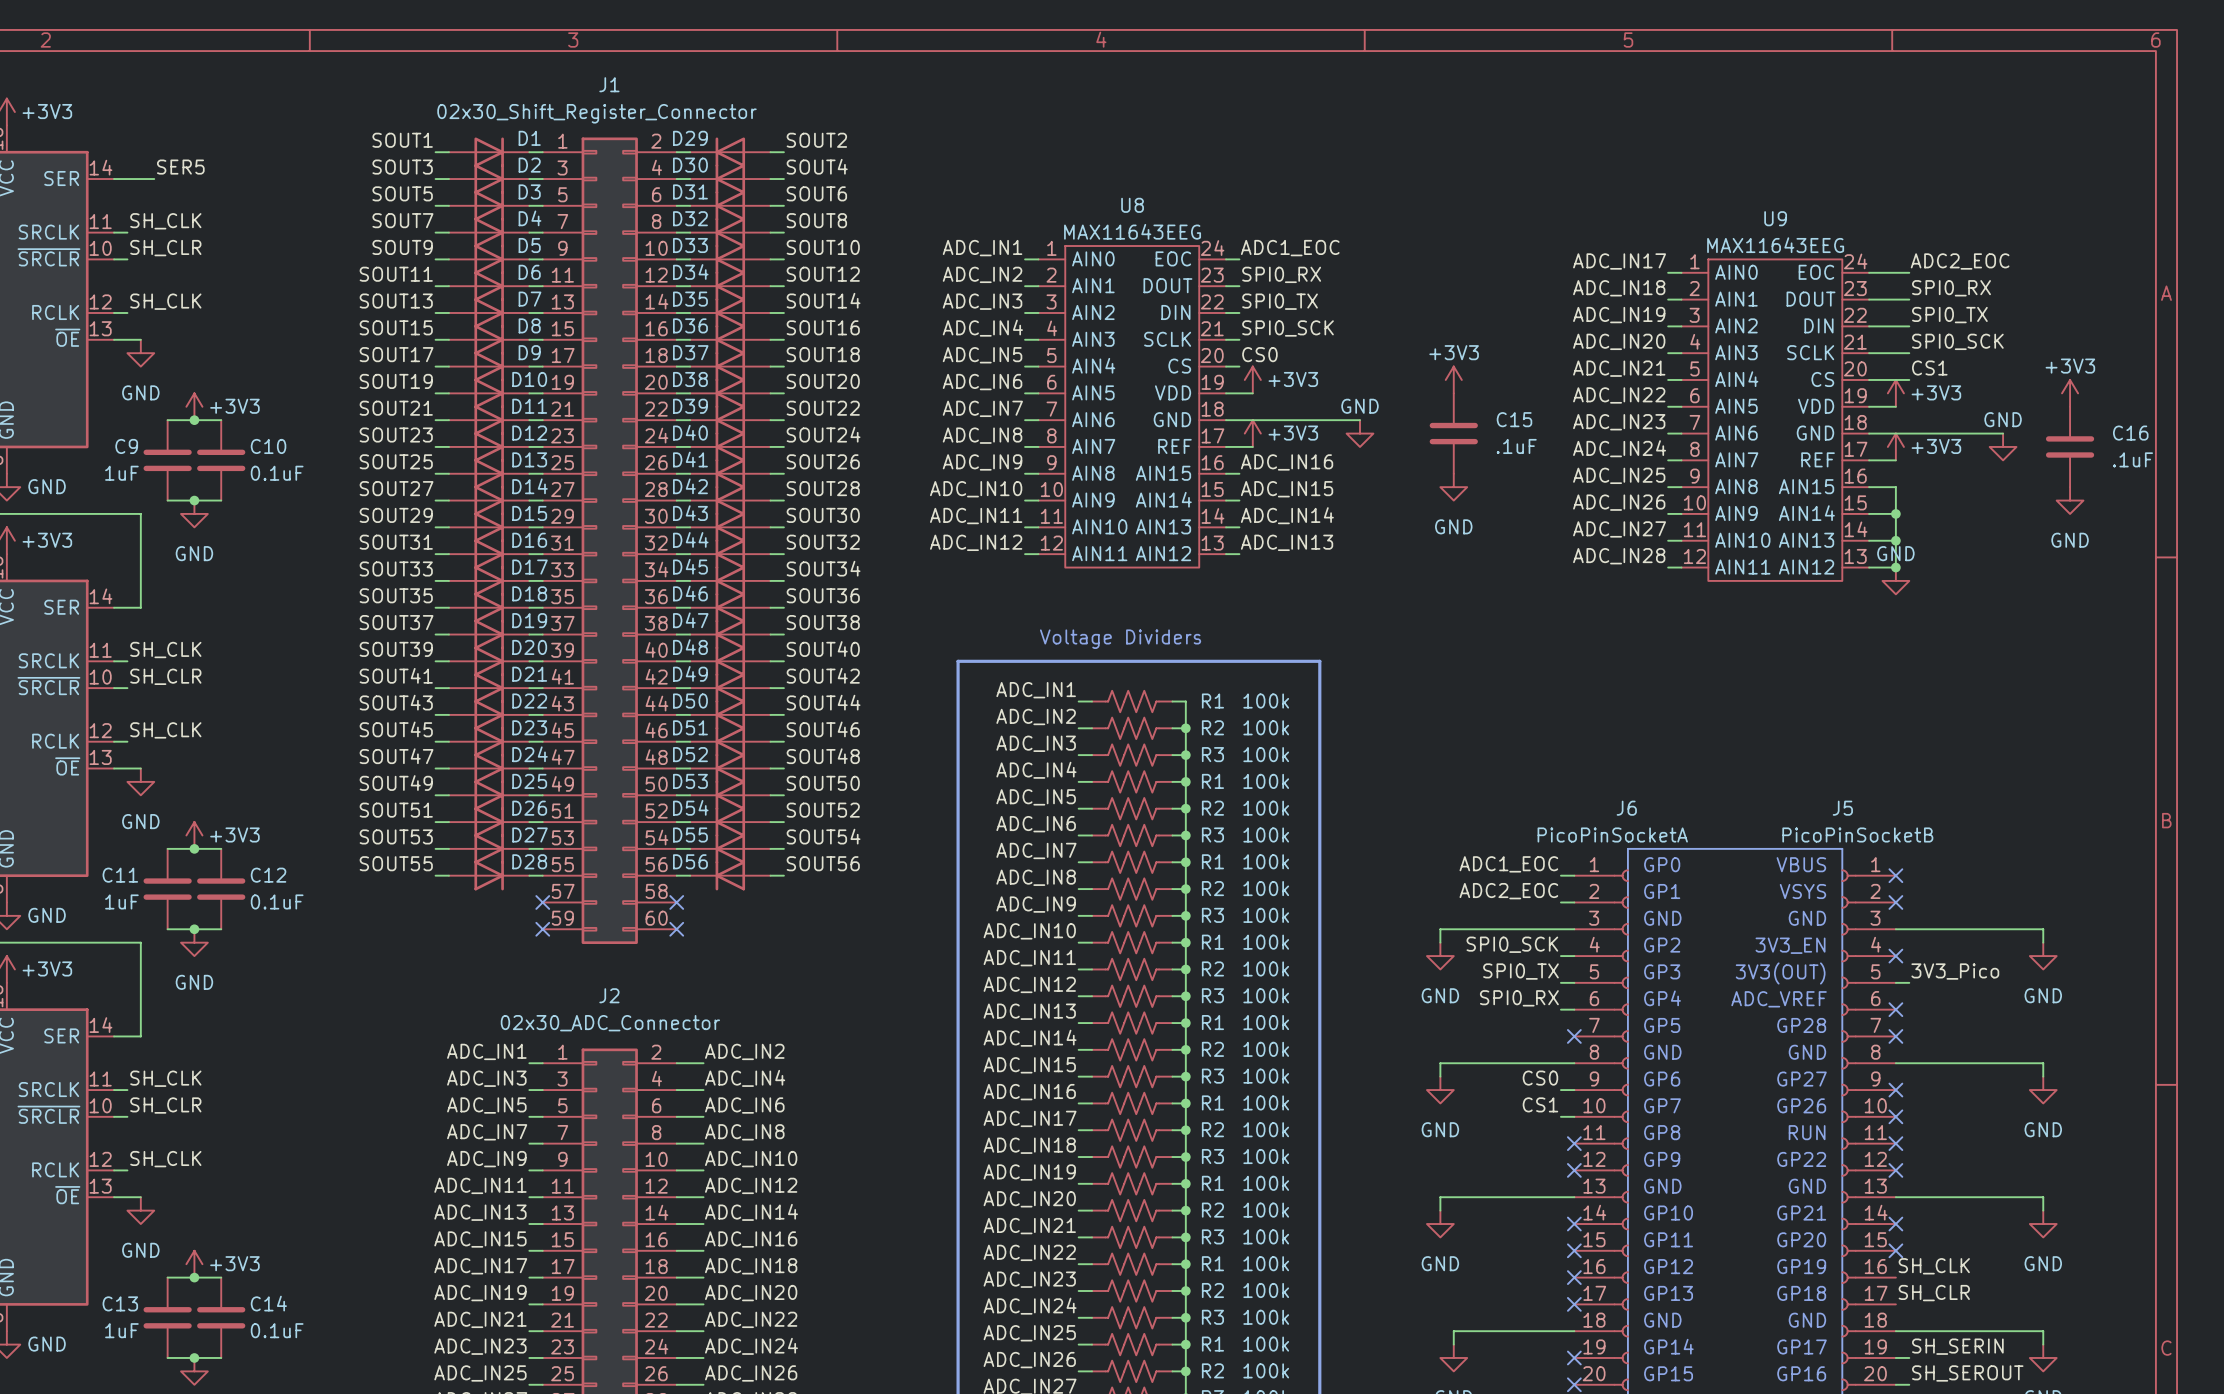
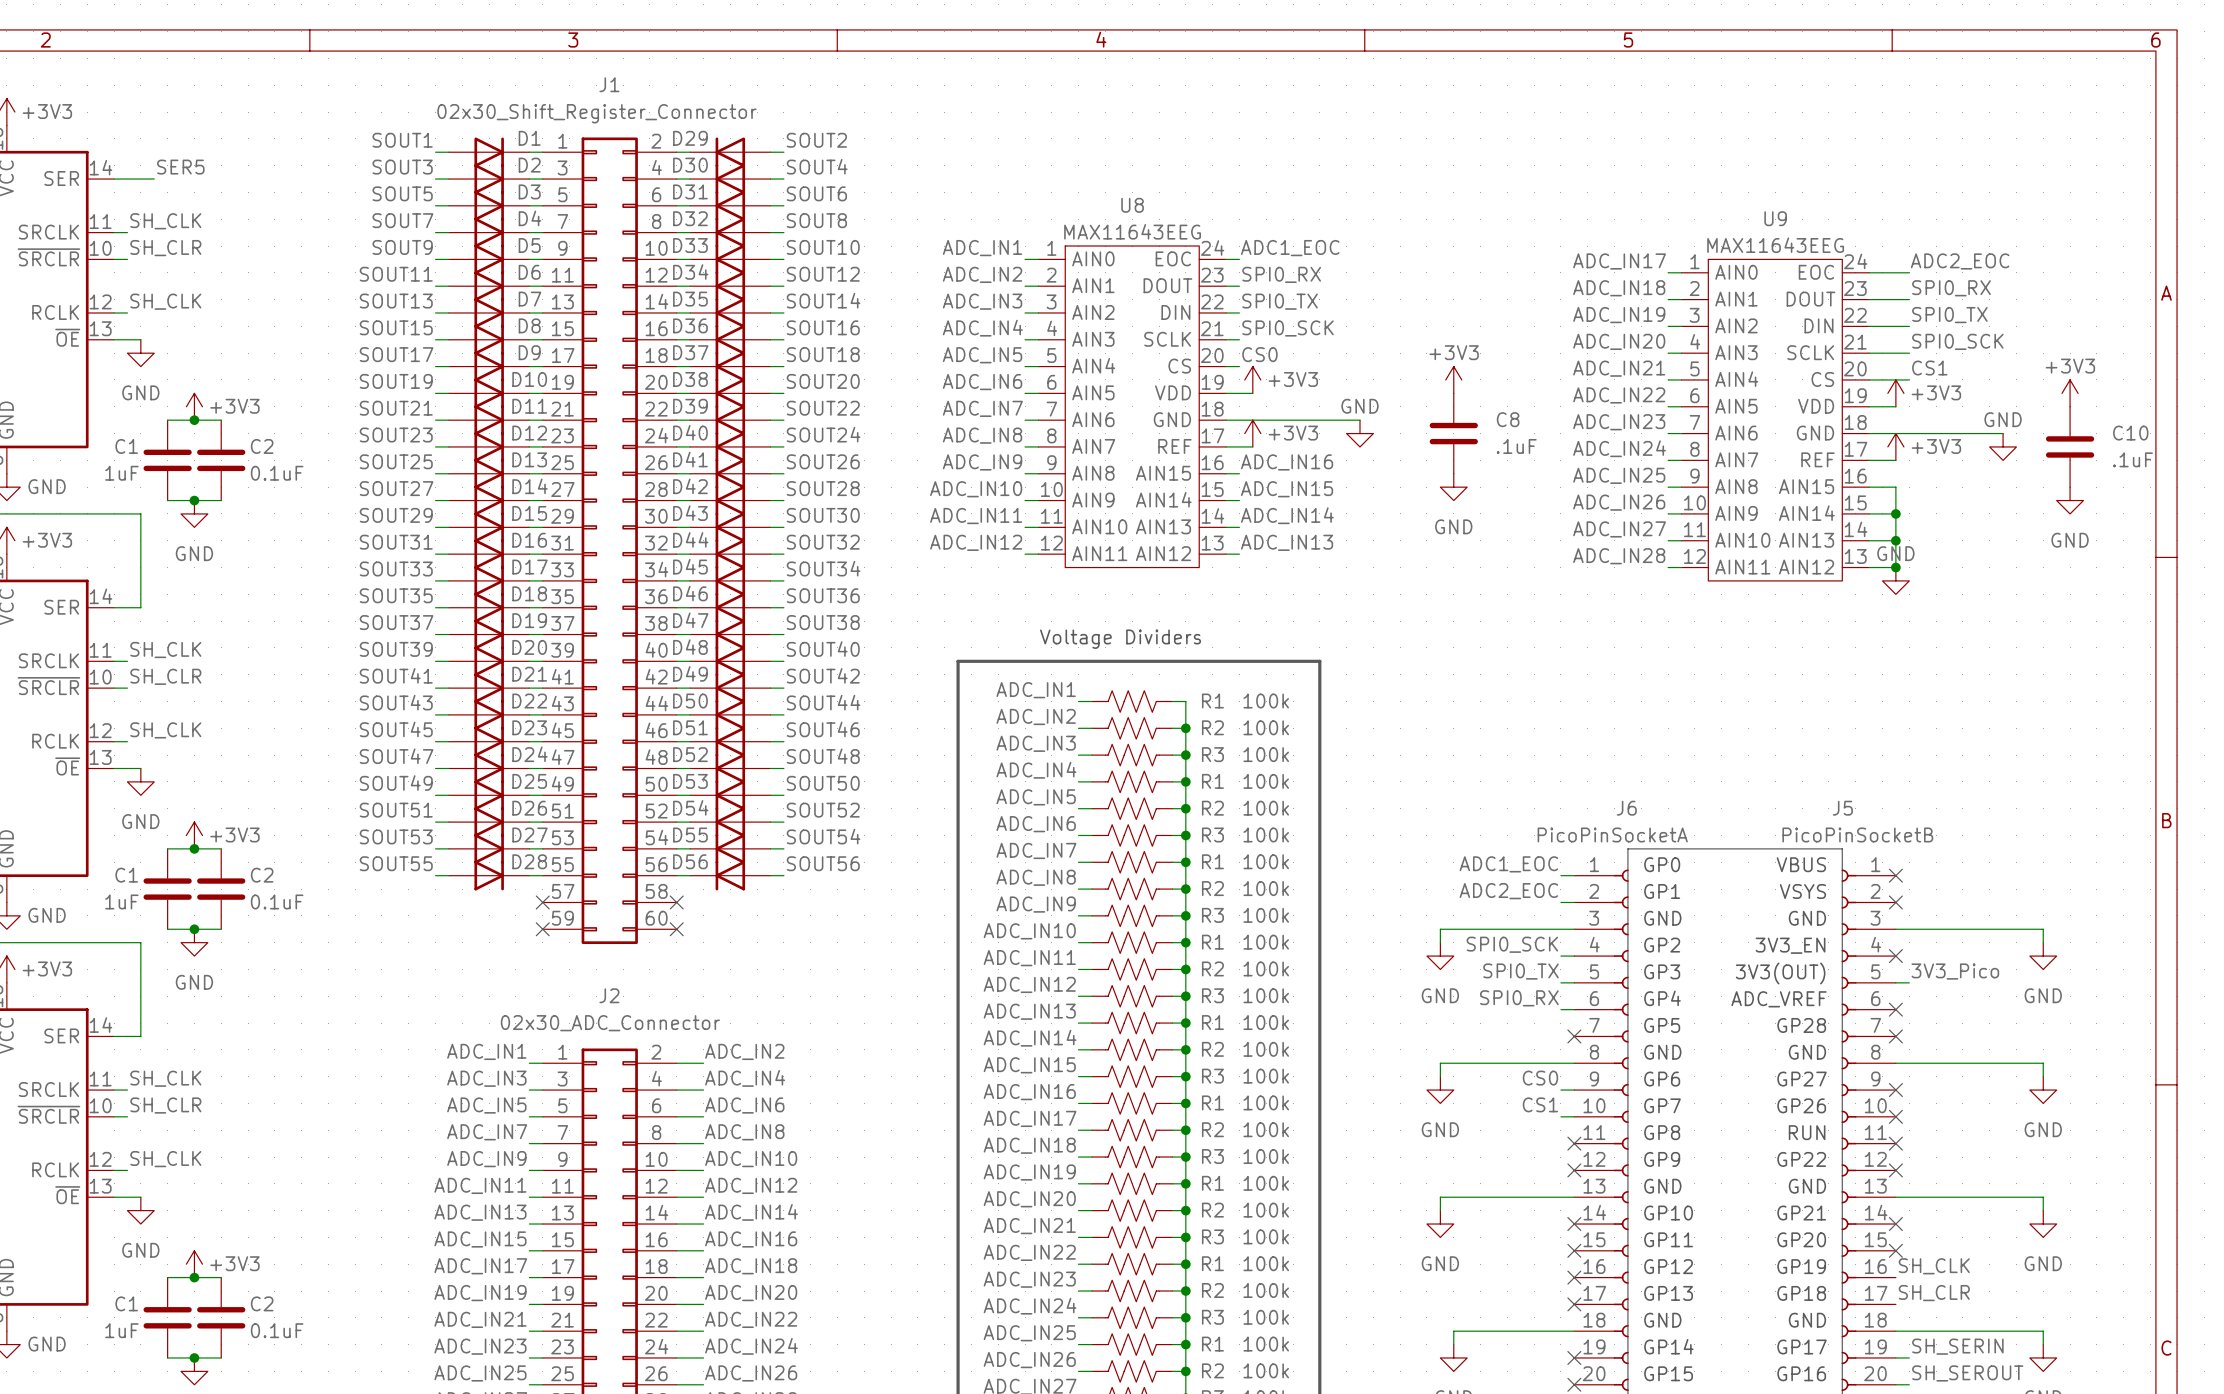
C15 name: C15 (1514, 419) -> C8 (1508, 419)
C16 name: C16 (2130, 433) -> C10 (2130, 433)
C9 name: C9 (126, 446) -> C1 (126, 446)
C10 name: C10 (268, 446) -> C2 (262, 446)
C11 name: C11 (120, 875) -> C1 (126, 875)
C12 name: C12 (268, 875) -> C2 (262, 875)
C13 name: C13 (120, 1303) -> C1 (126, 1303)
C14 name: C14 (268, 1303) -> C2 (262, 1303)

